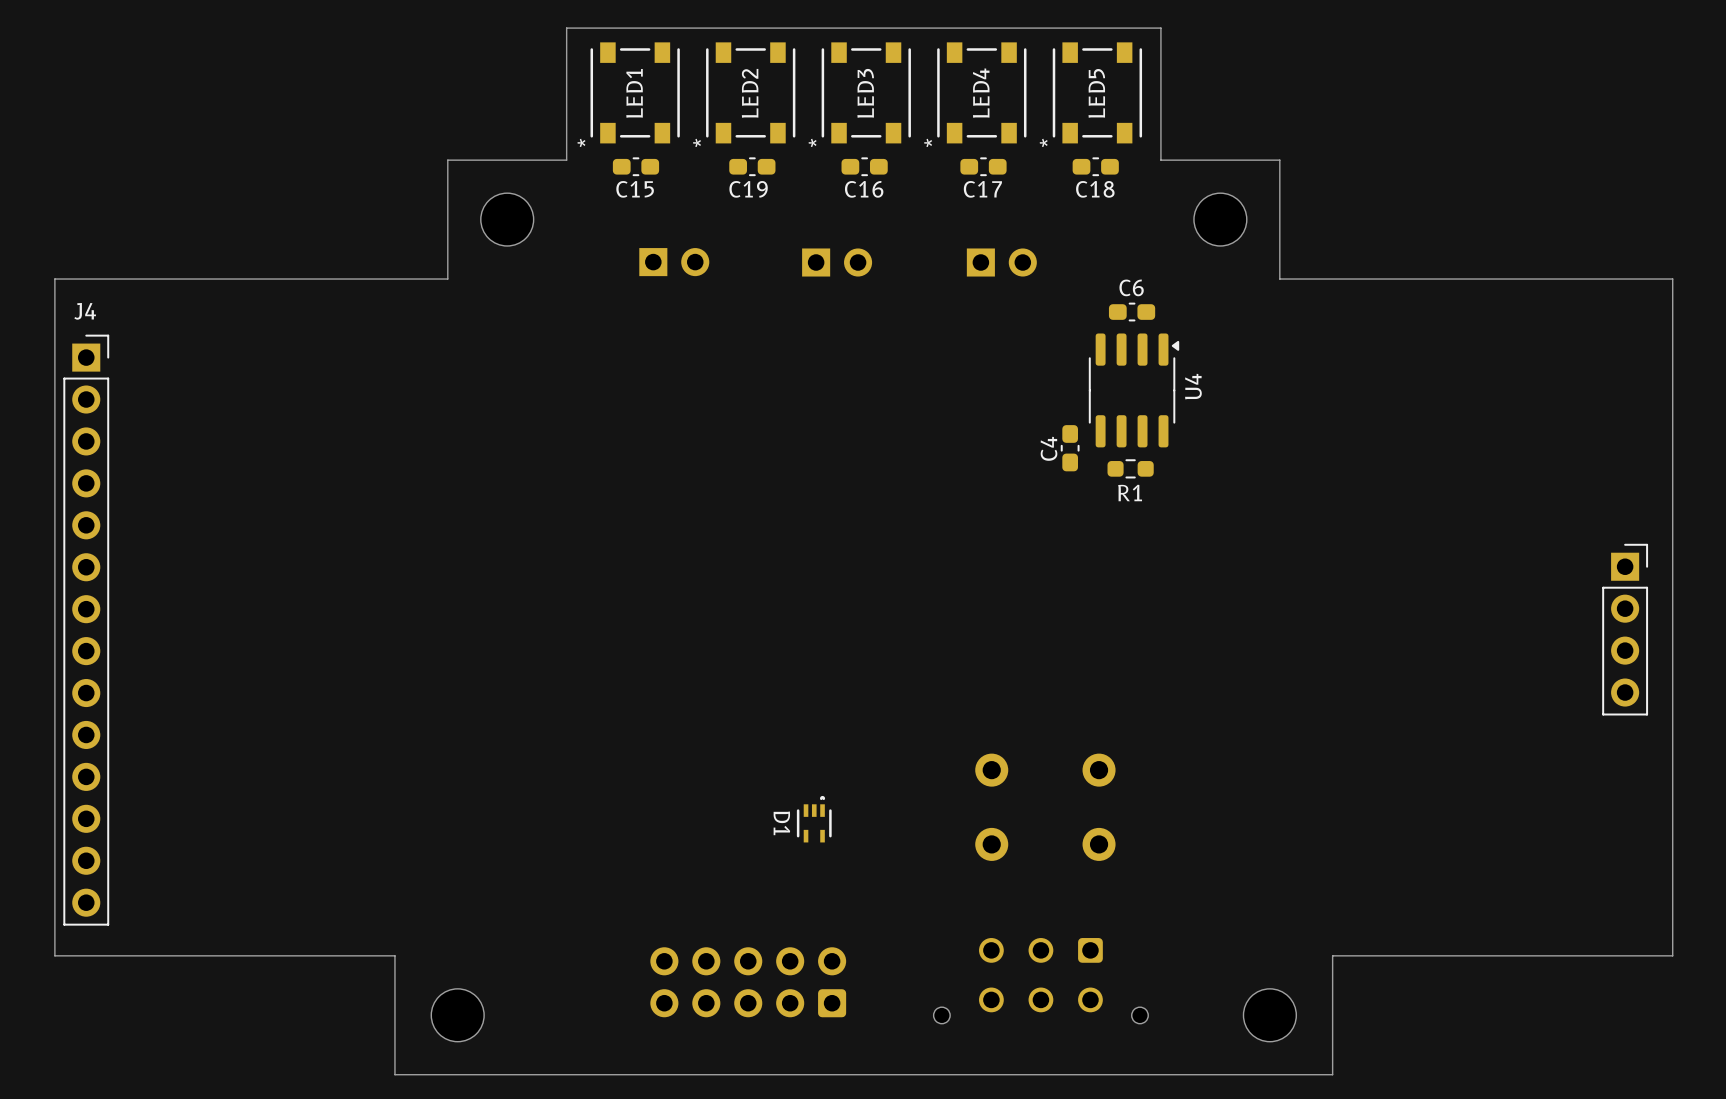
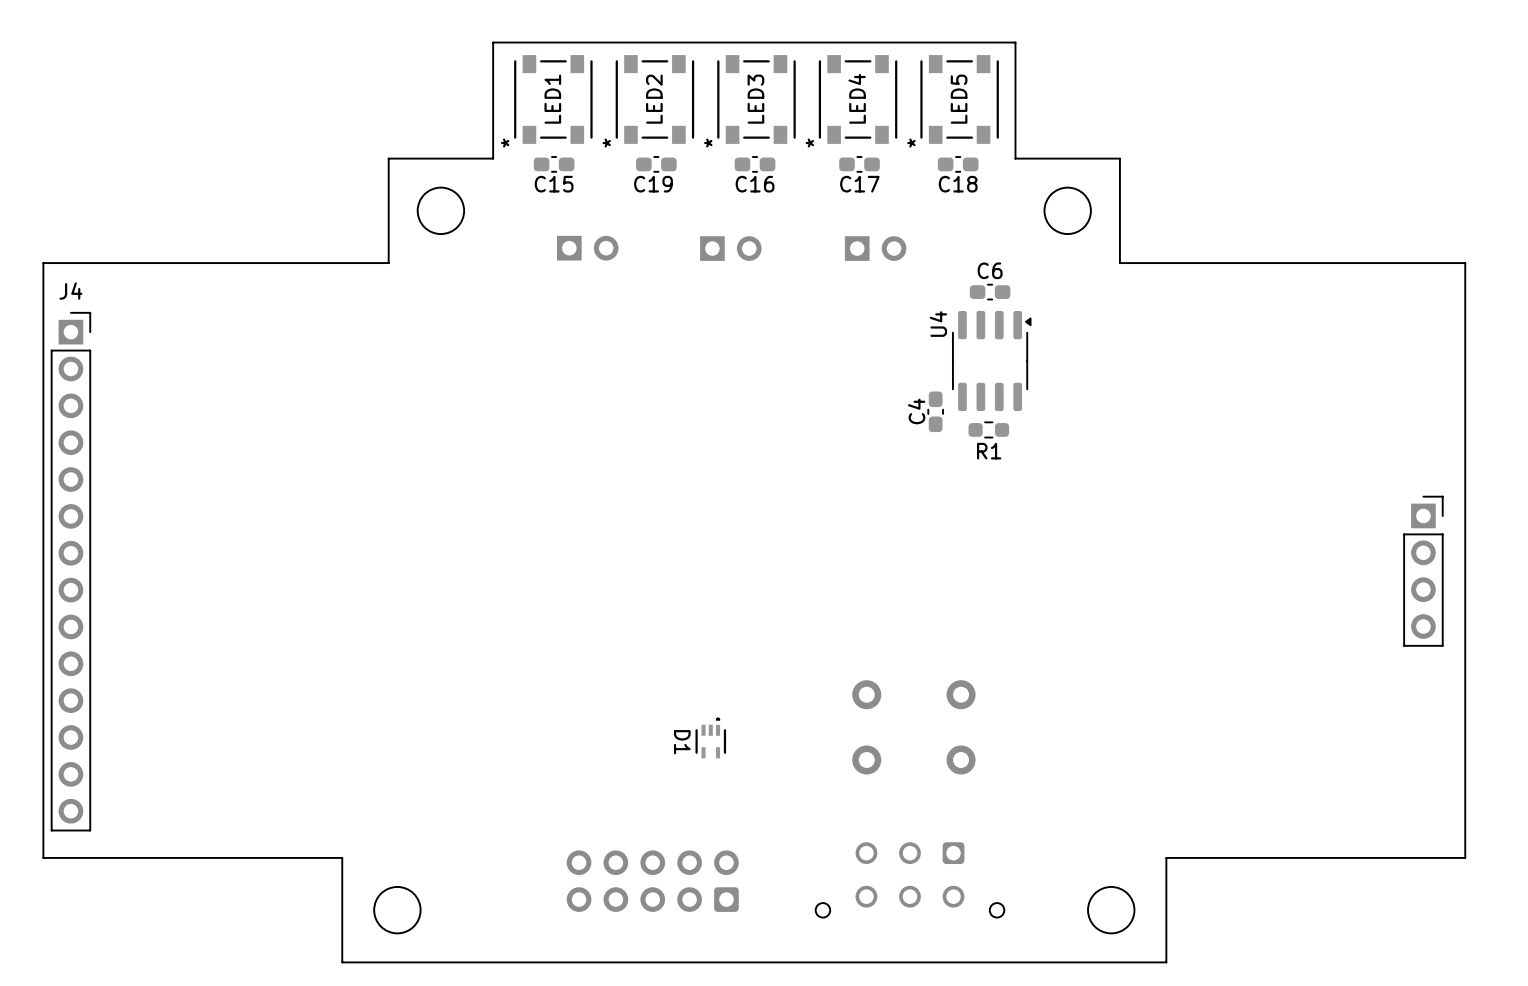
U4 name position: U4 (1193, 386) -> U4 (938, 324)

